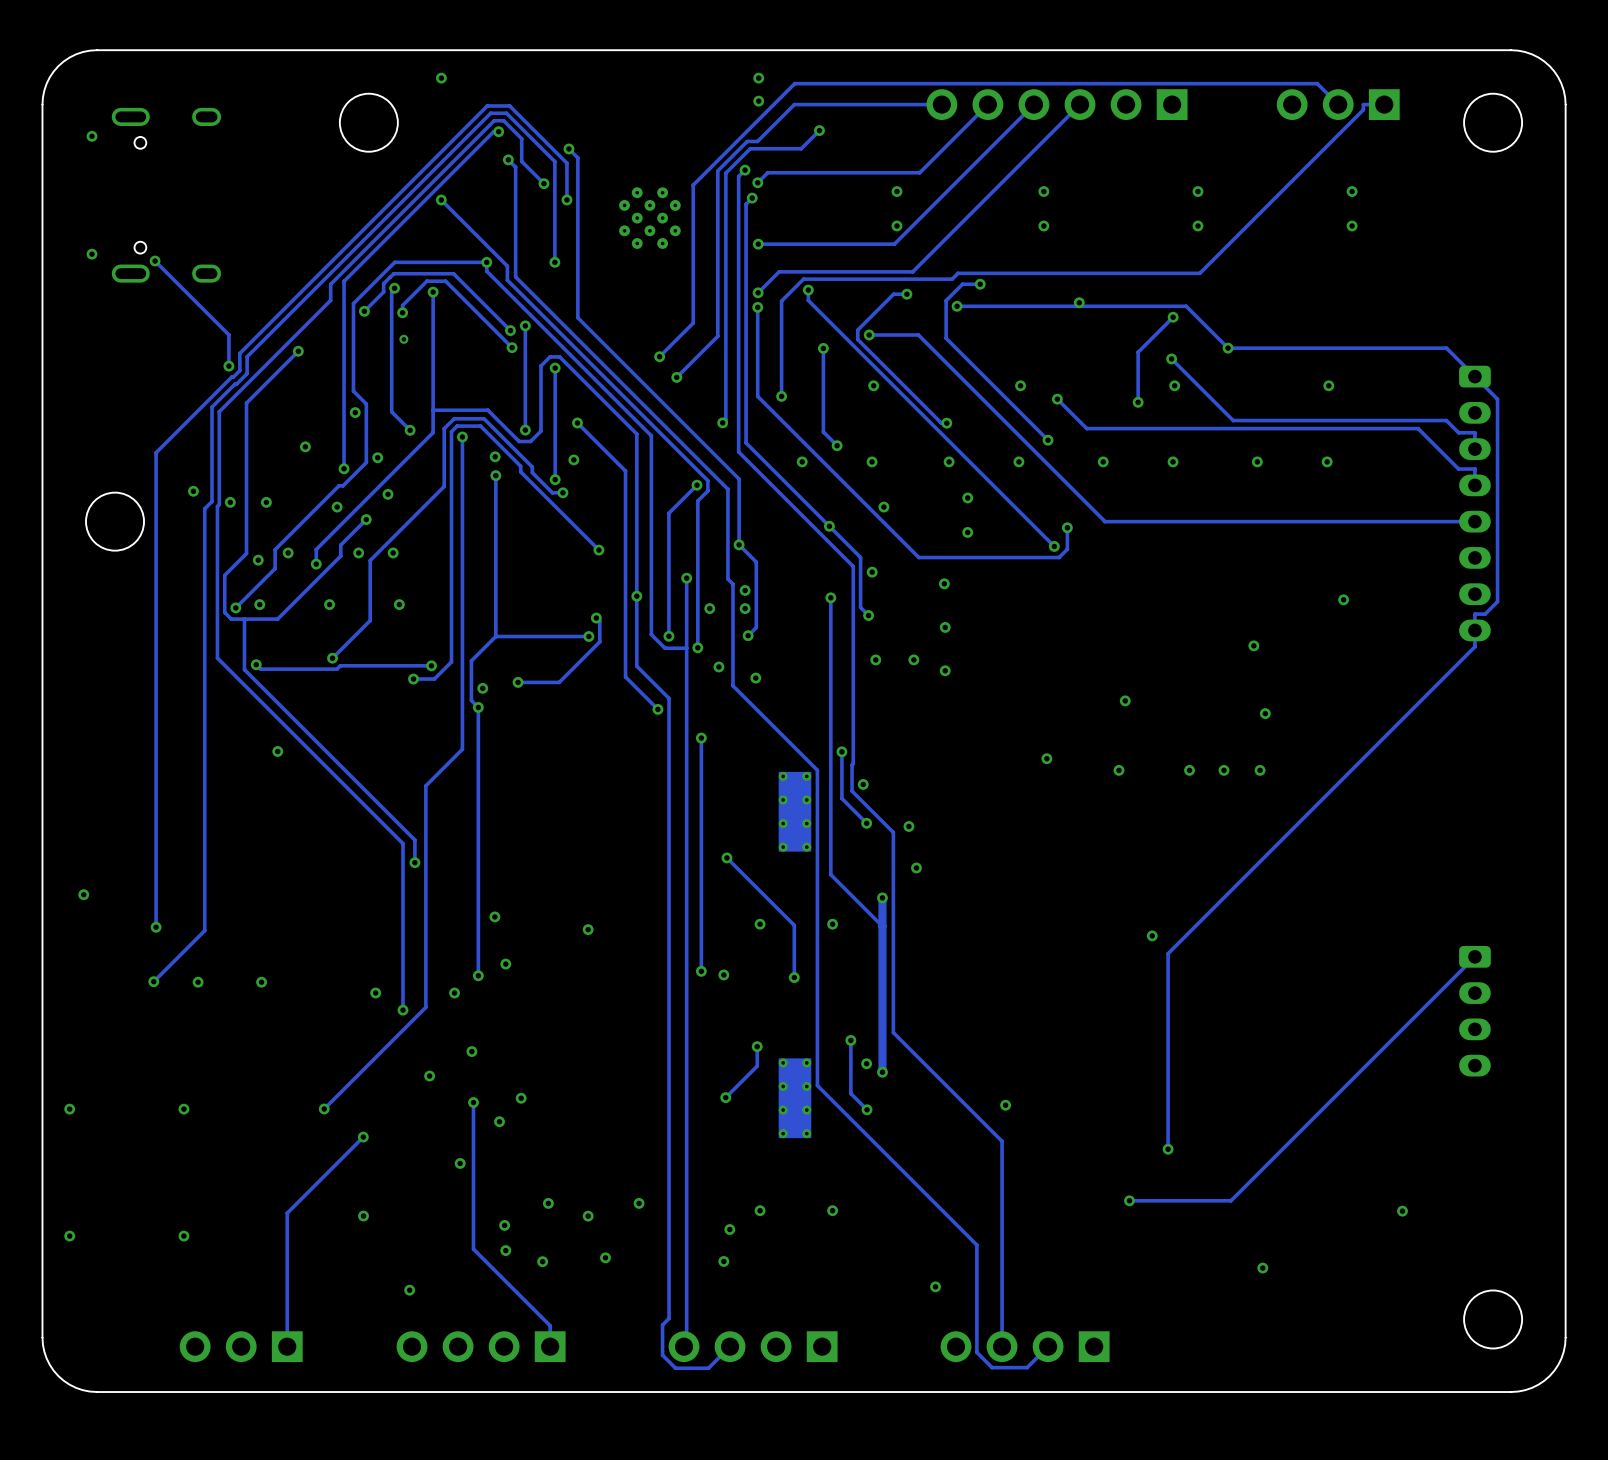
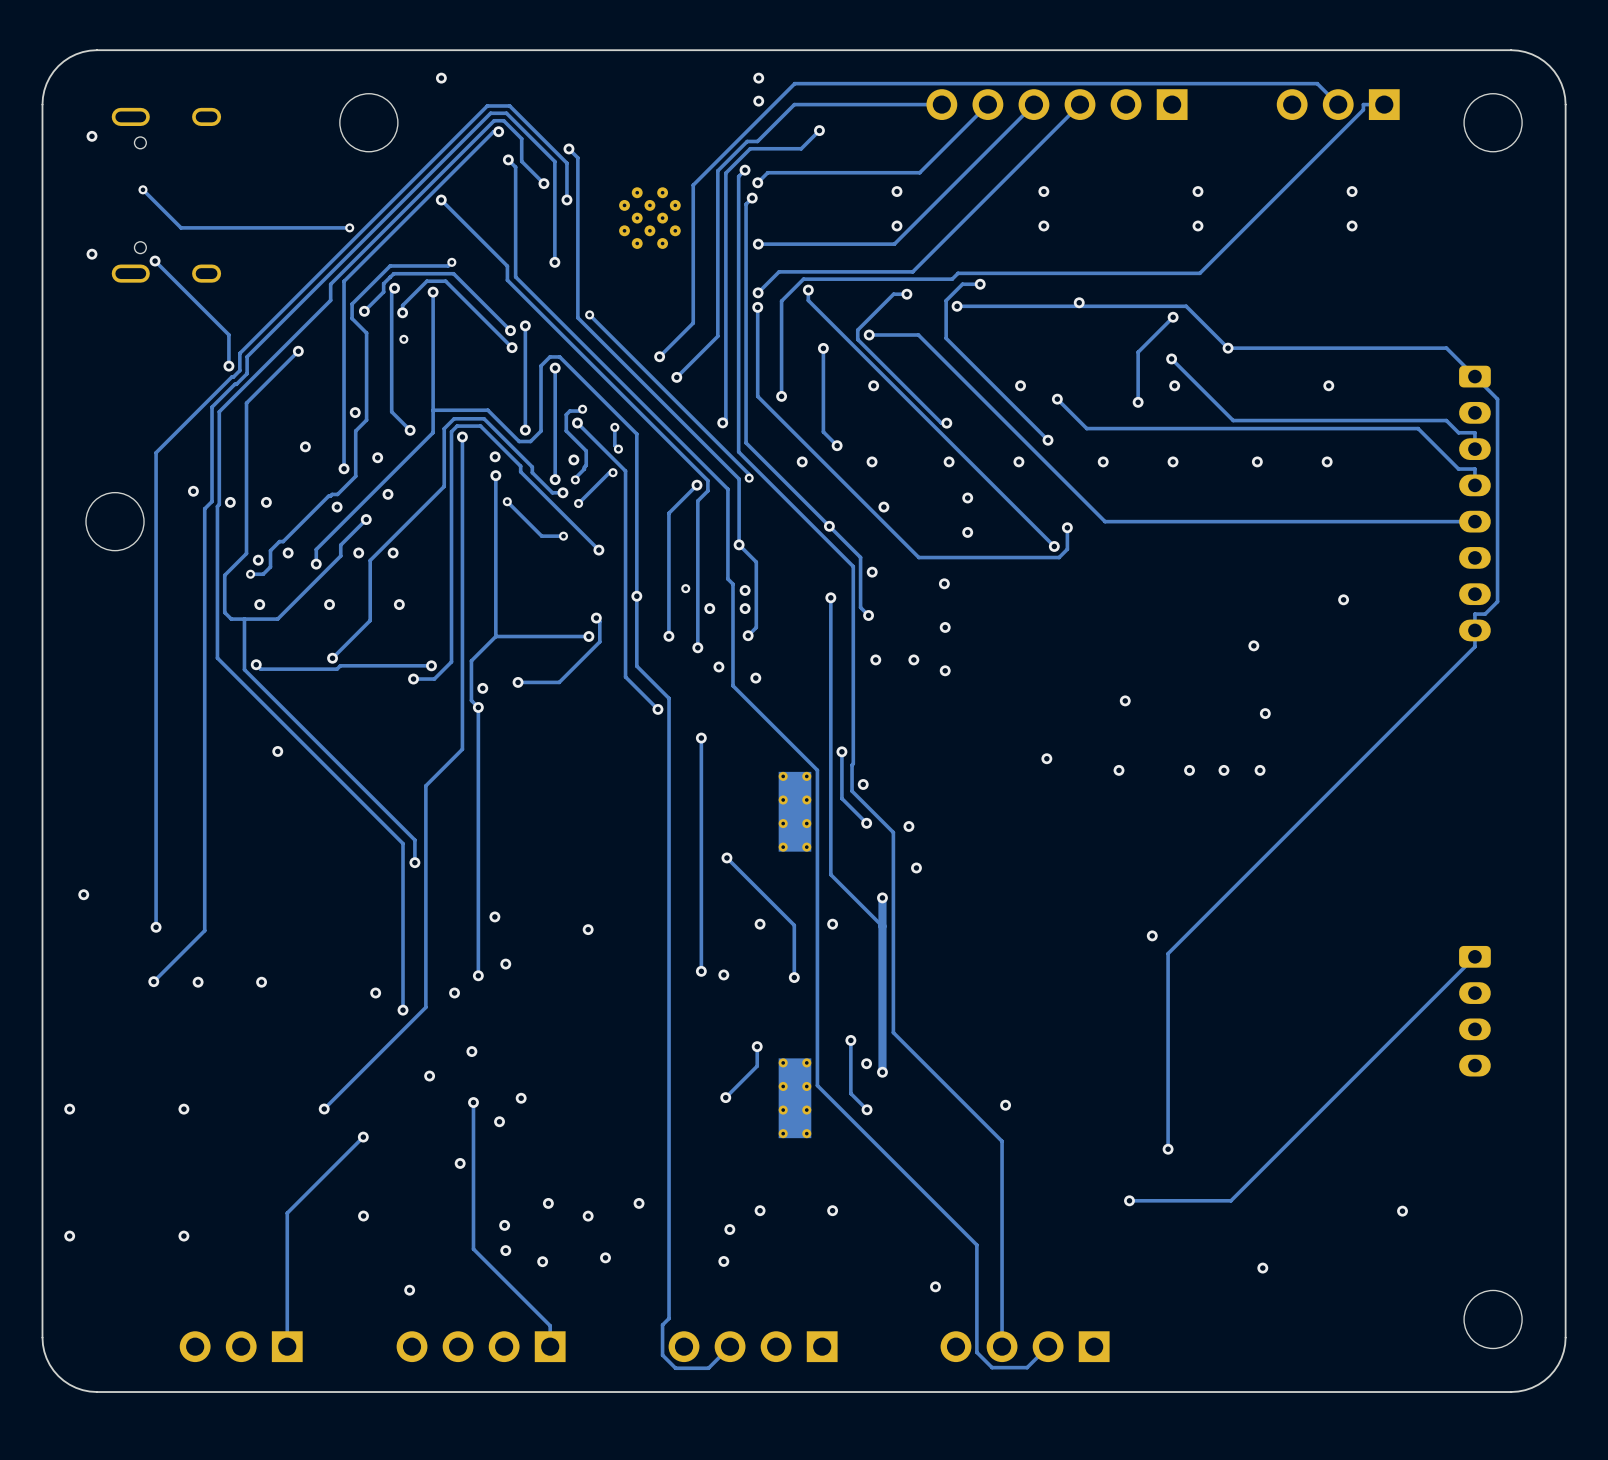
track: none -> (142, 189) (181, 227) (349, 227)
via: none -> (142, 189)
via: none -> (349, 227)
via: none -> (451, 262)
via: (486, 262) -> none
track: none -> (589, 314) (749, 474) (749, 478)
via: none -> (589, 314)
track: none -> (582, 409) (580, 411) (569, 411) (566, 414) (566, 430) (586, 450) (586, 465) (575, 479)
via: none -> (582, 409)
track: none -> (614, 427) (614, 445) (618, 449)
via: none -> (614, 427)
via: none -> (618, 449)
track: none -> (613, 472) (609, 472) (578, 503)
via: none -> (613, 472)
via: none -> (749, 478)
via: none -> (575, 479)
track: (328, 496) (339, 485) (343, 485) (366, 462) (366, 404) (353, 391) (353, 303) (394, 262) (486, 262) (486, 271) (651, 435) (651, 634) (665, 648) (686, 648) -> (328, 496) (337, 494) (355, 476) (355, 430) (366, 420) (366, 333) (352, 318) (352, 304) (390, 265) (448, 265) (451, 262)
track: none -> (507, 501) (541, 536) (563, 536)
via: none -> (507, 501)
via: none -> (578, 503)
via: none -> (563, 536)
track: (283, 541) (275, 549) (275, 568) (235, 607) -> (283, 541) (279, 541) (270, 550) (270, 566) (263, 574) (250, 574)
via: none -> (250, 574)
track: (686, 578) (686, 1344) (684, 1346) -> none
via: (686, 578) -> none
via: none -> (685, 588)
via: (235, 607) -> none

